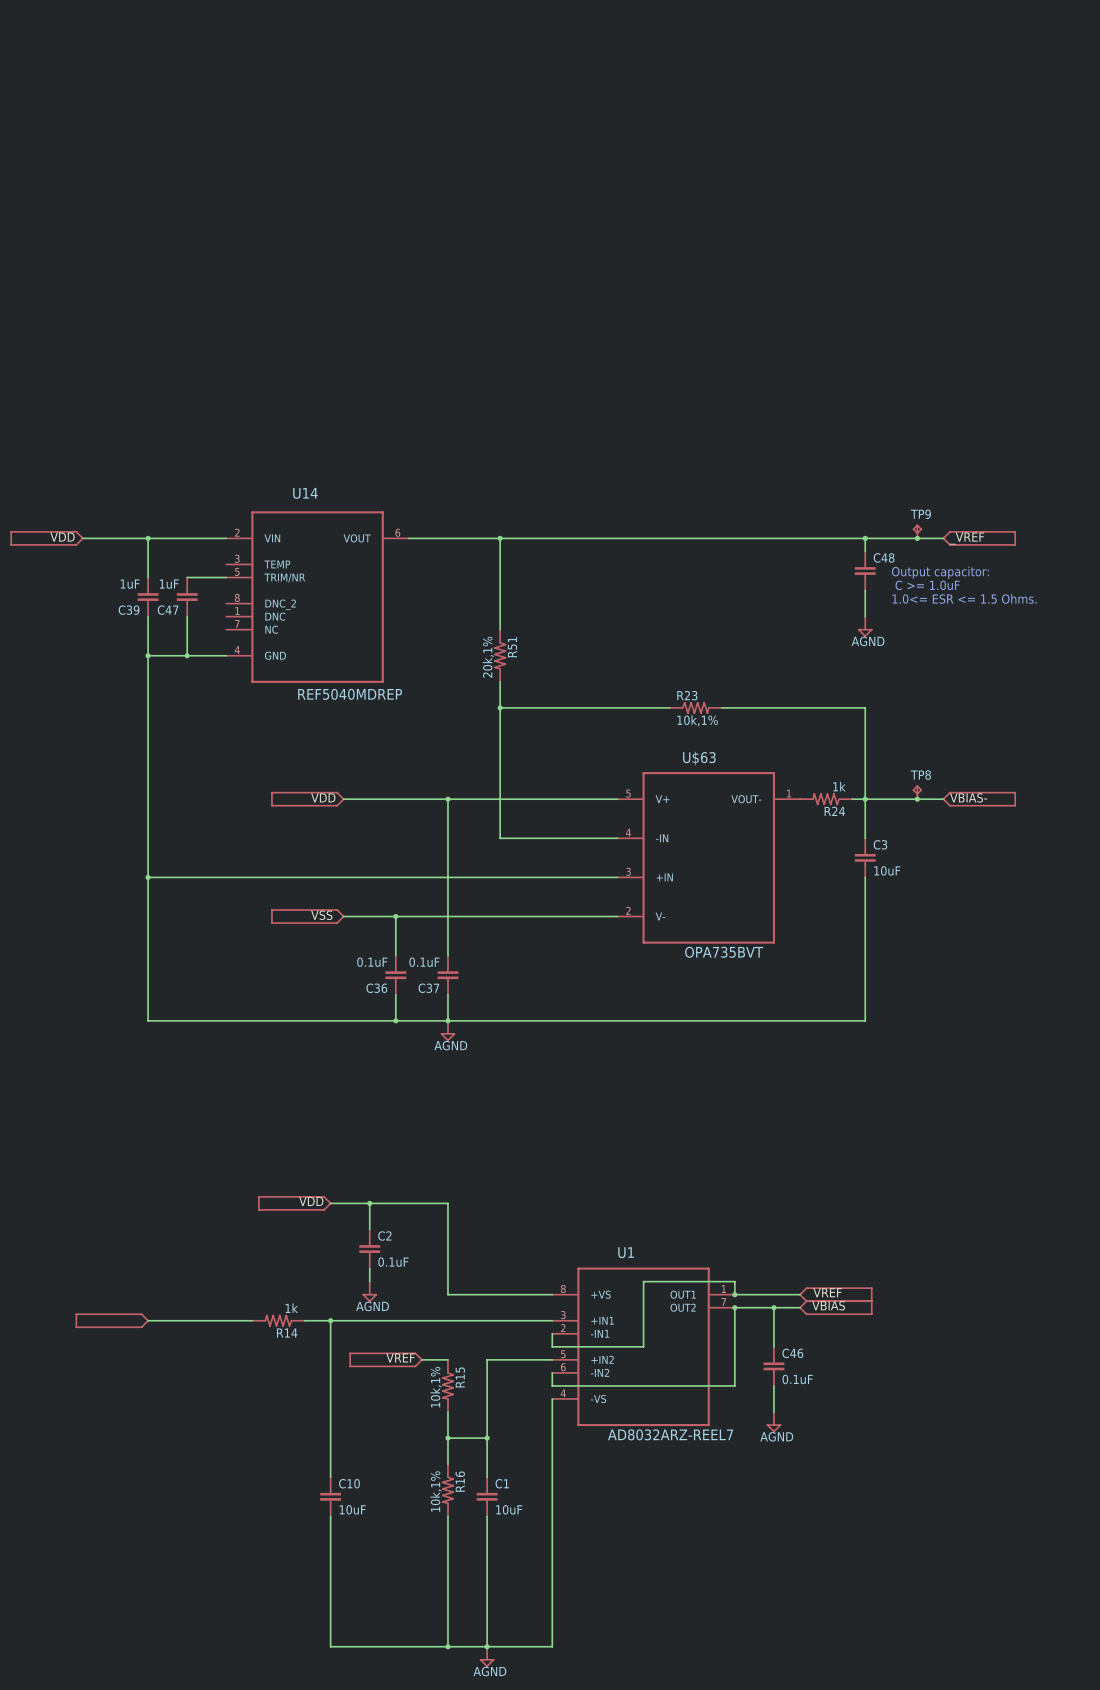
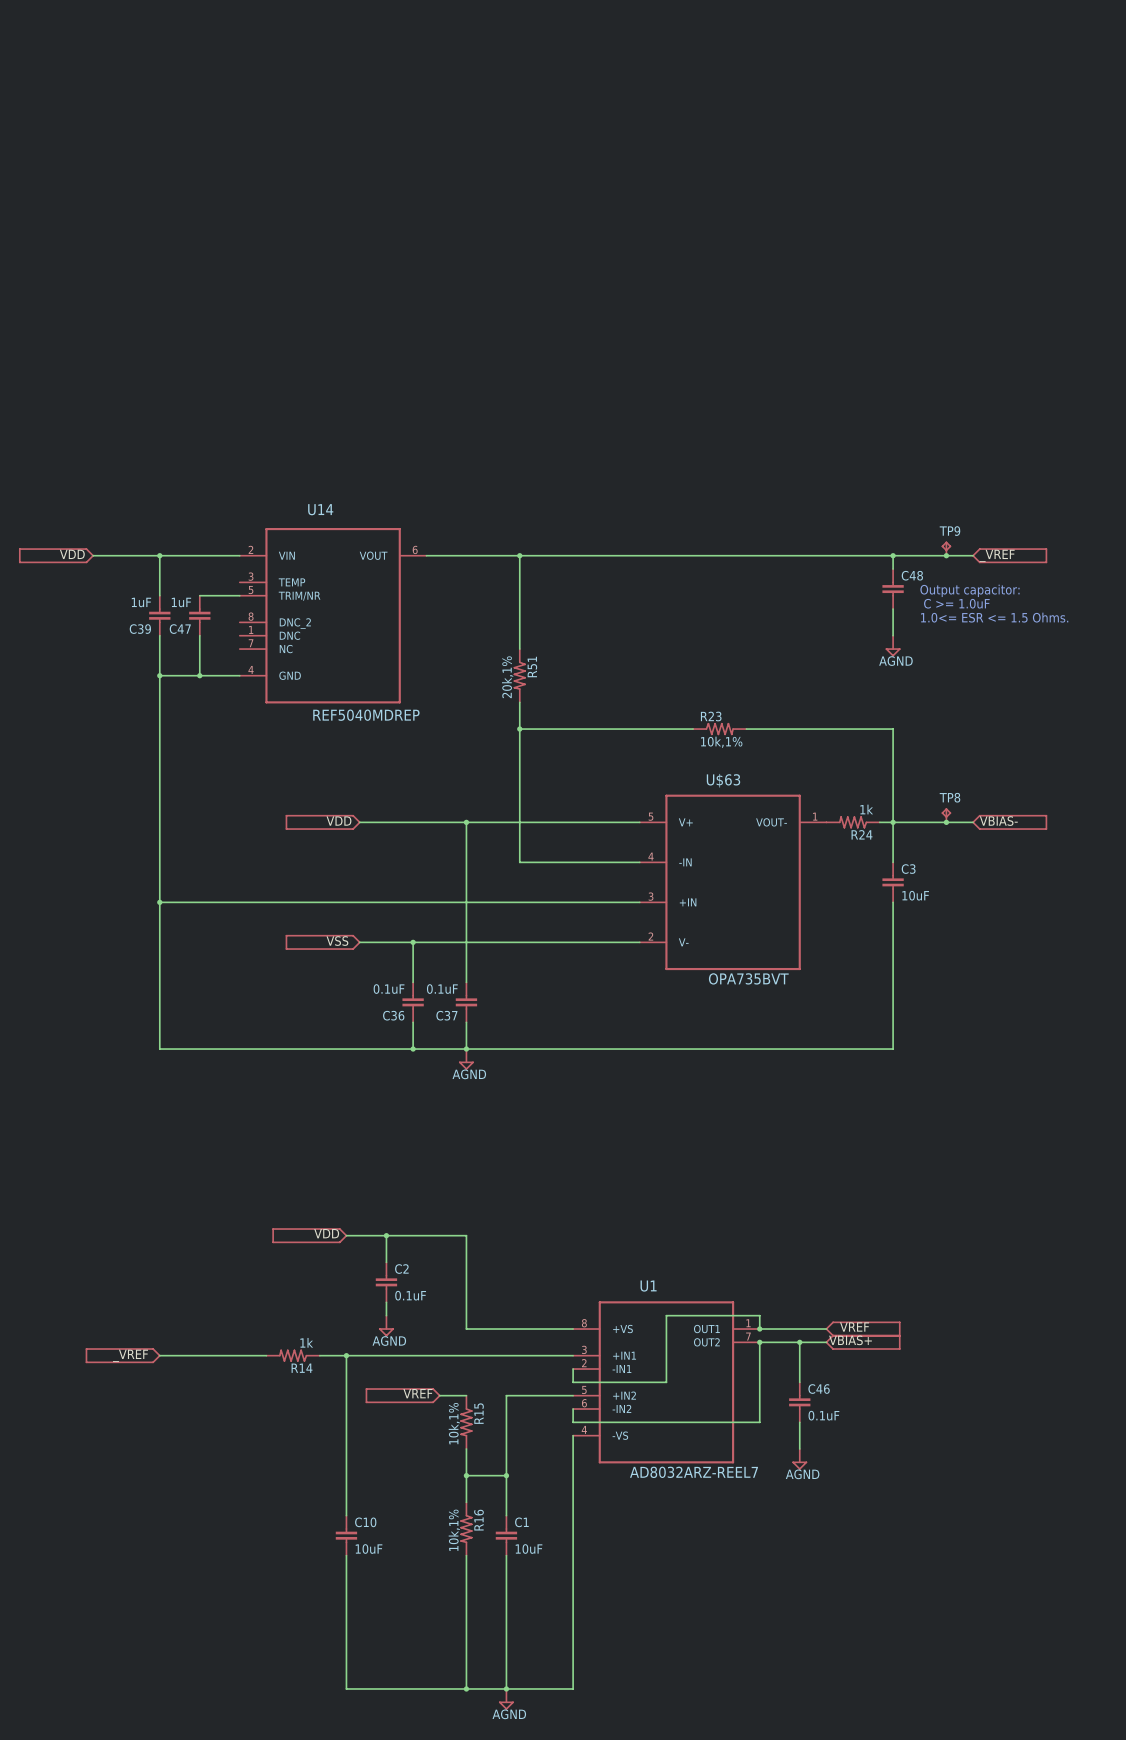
label: VBIAS (828, 1305) -> VBIAS+ (850, 1340)
label: none -> _VREF (130, 1355)

